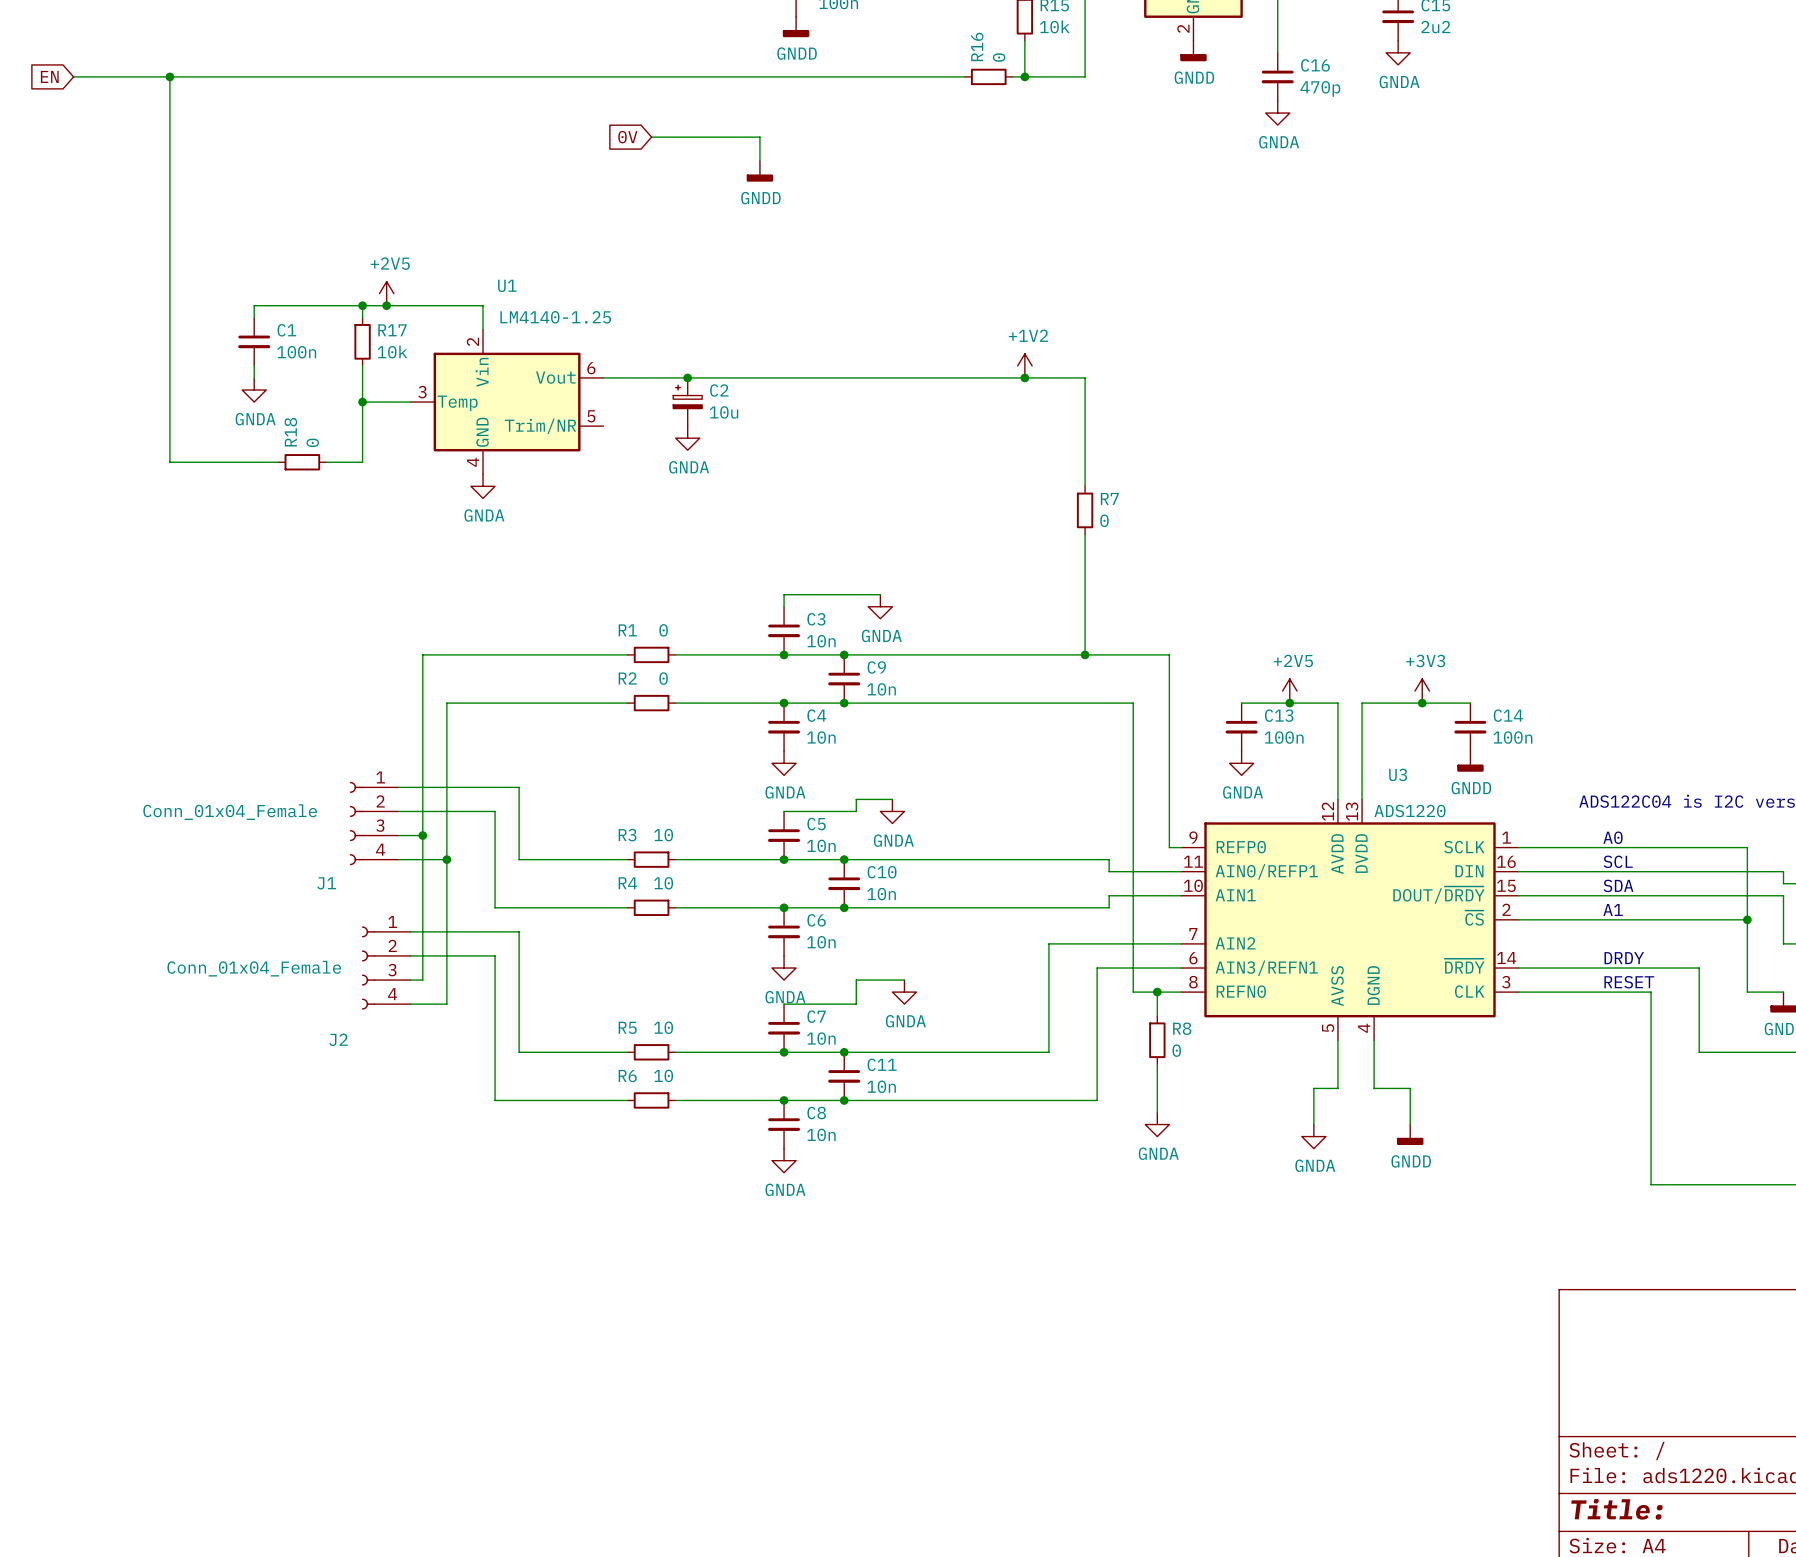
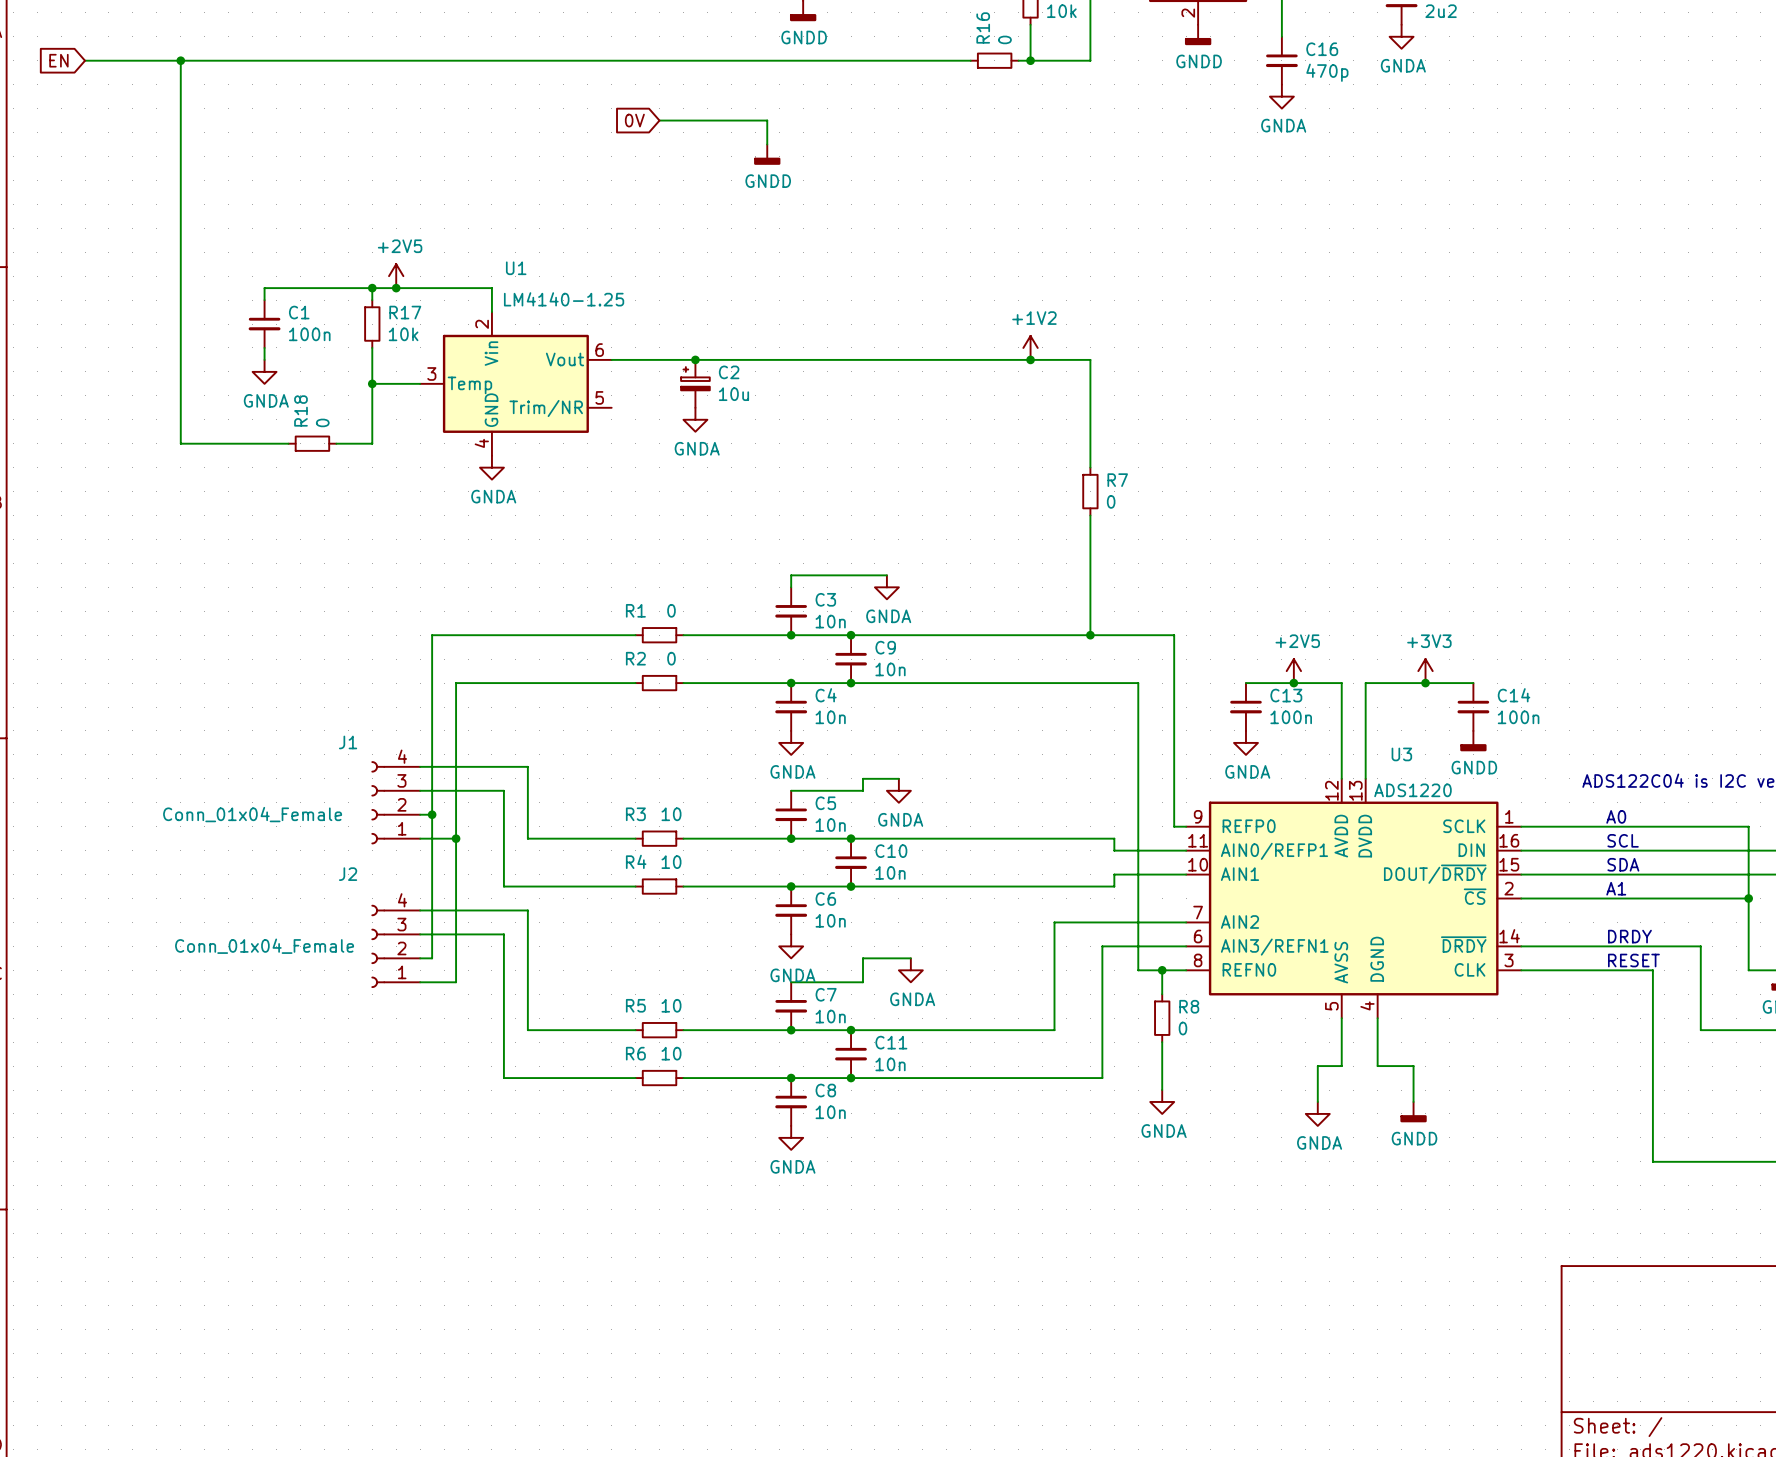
J1 flip: as is (356, 823) -> up-down (378, 802)
J2 flip: as is (368, 968) -> up-down (378, 946)

